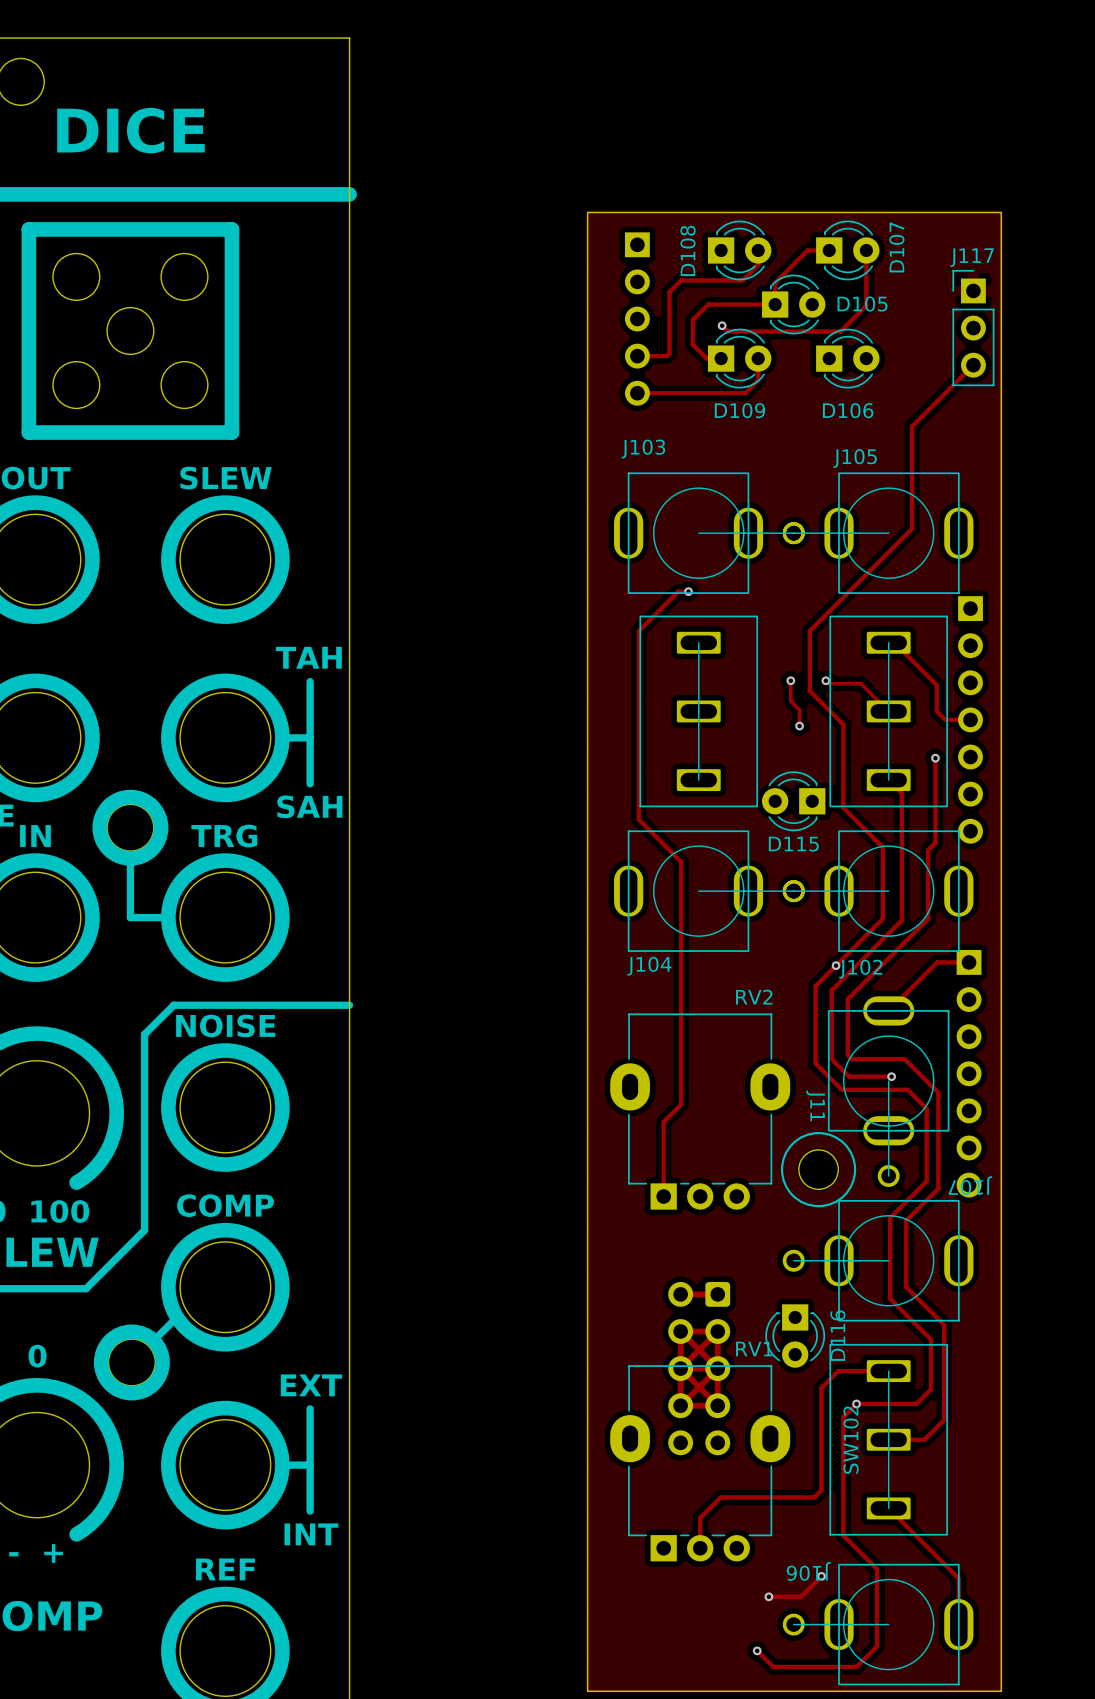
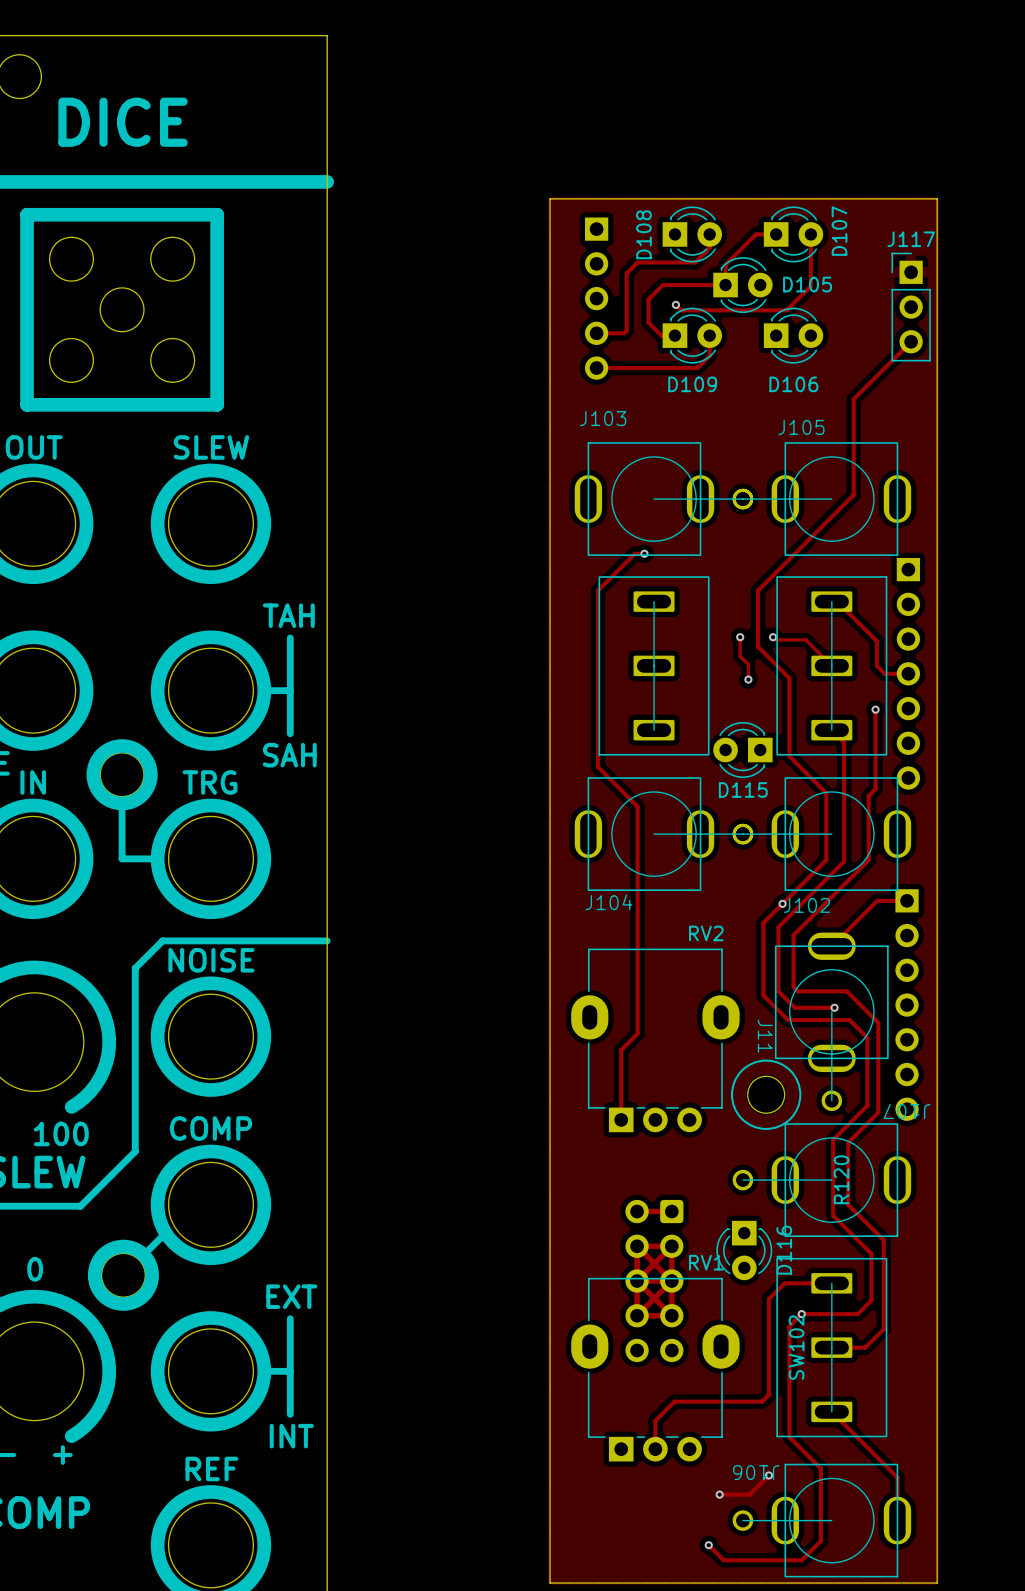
R120: none -> (841, 1179)

